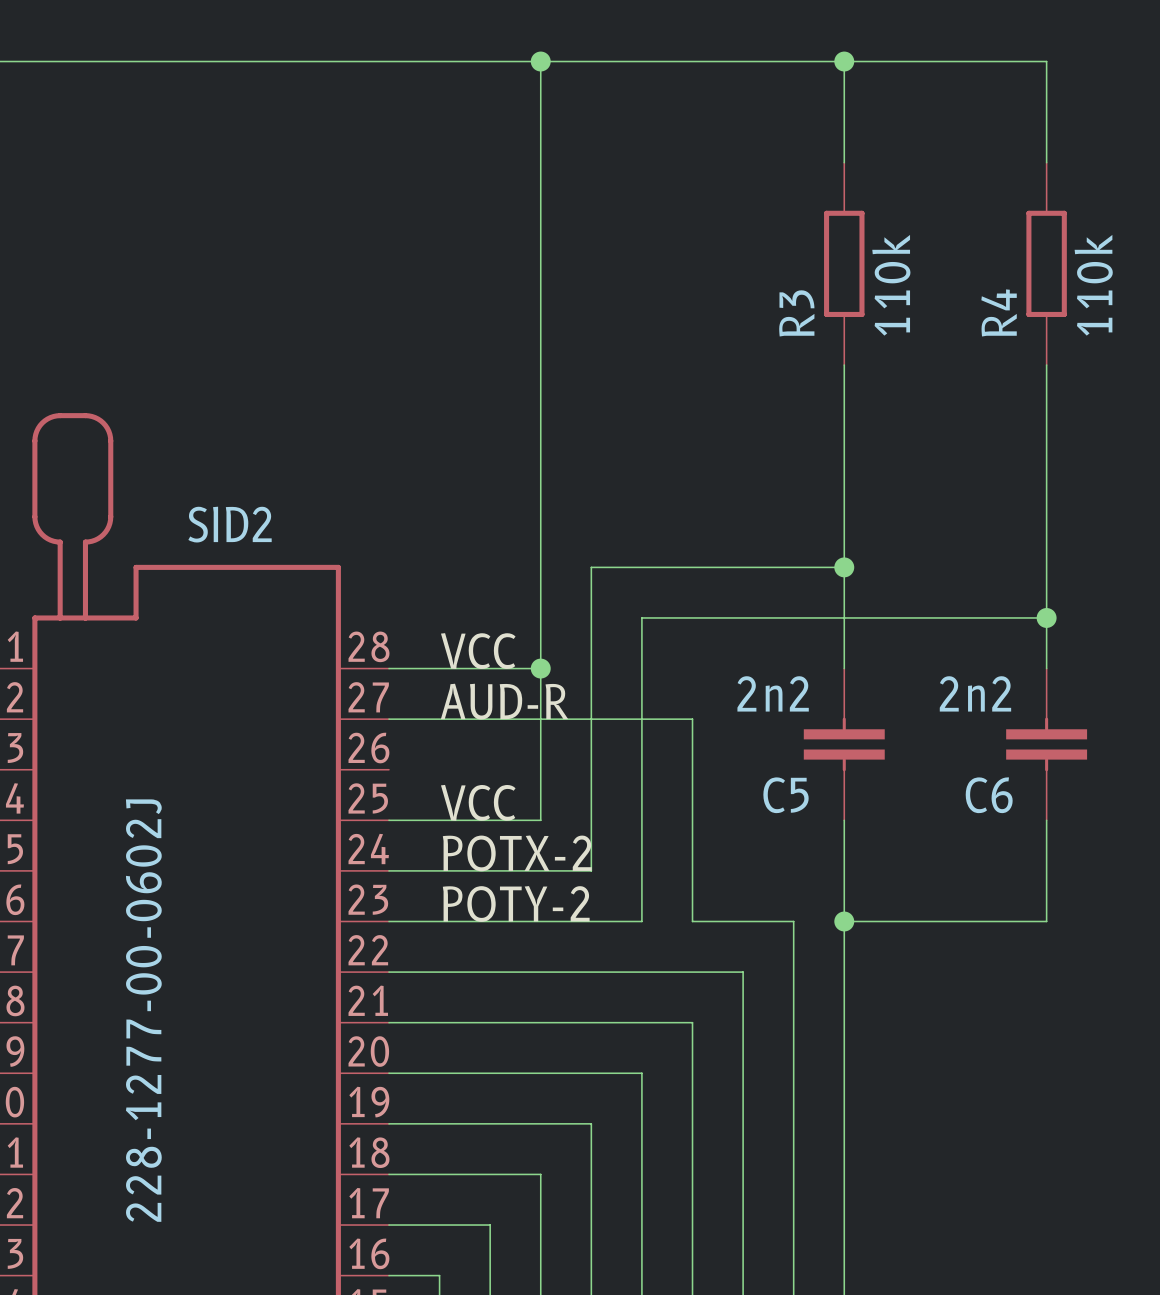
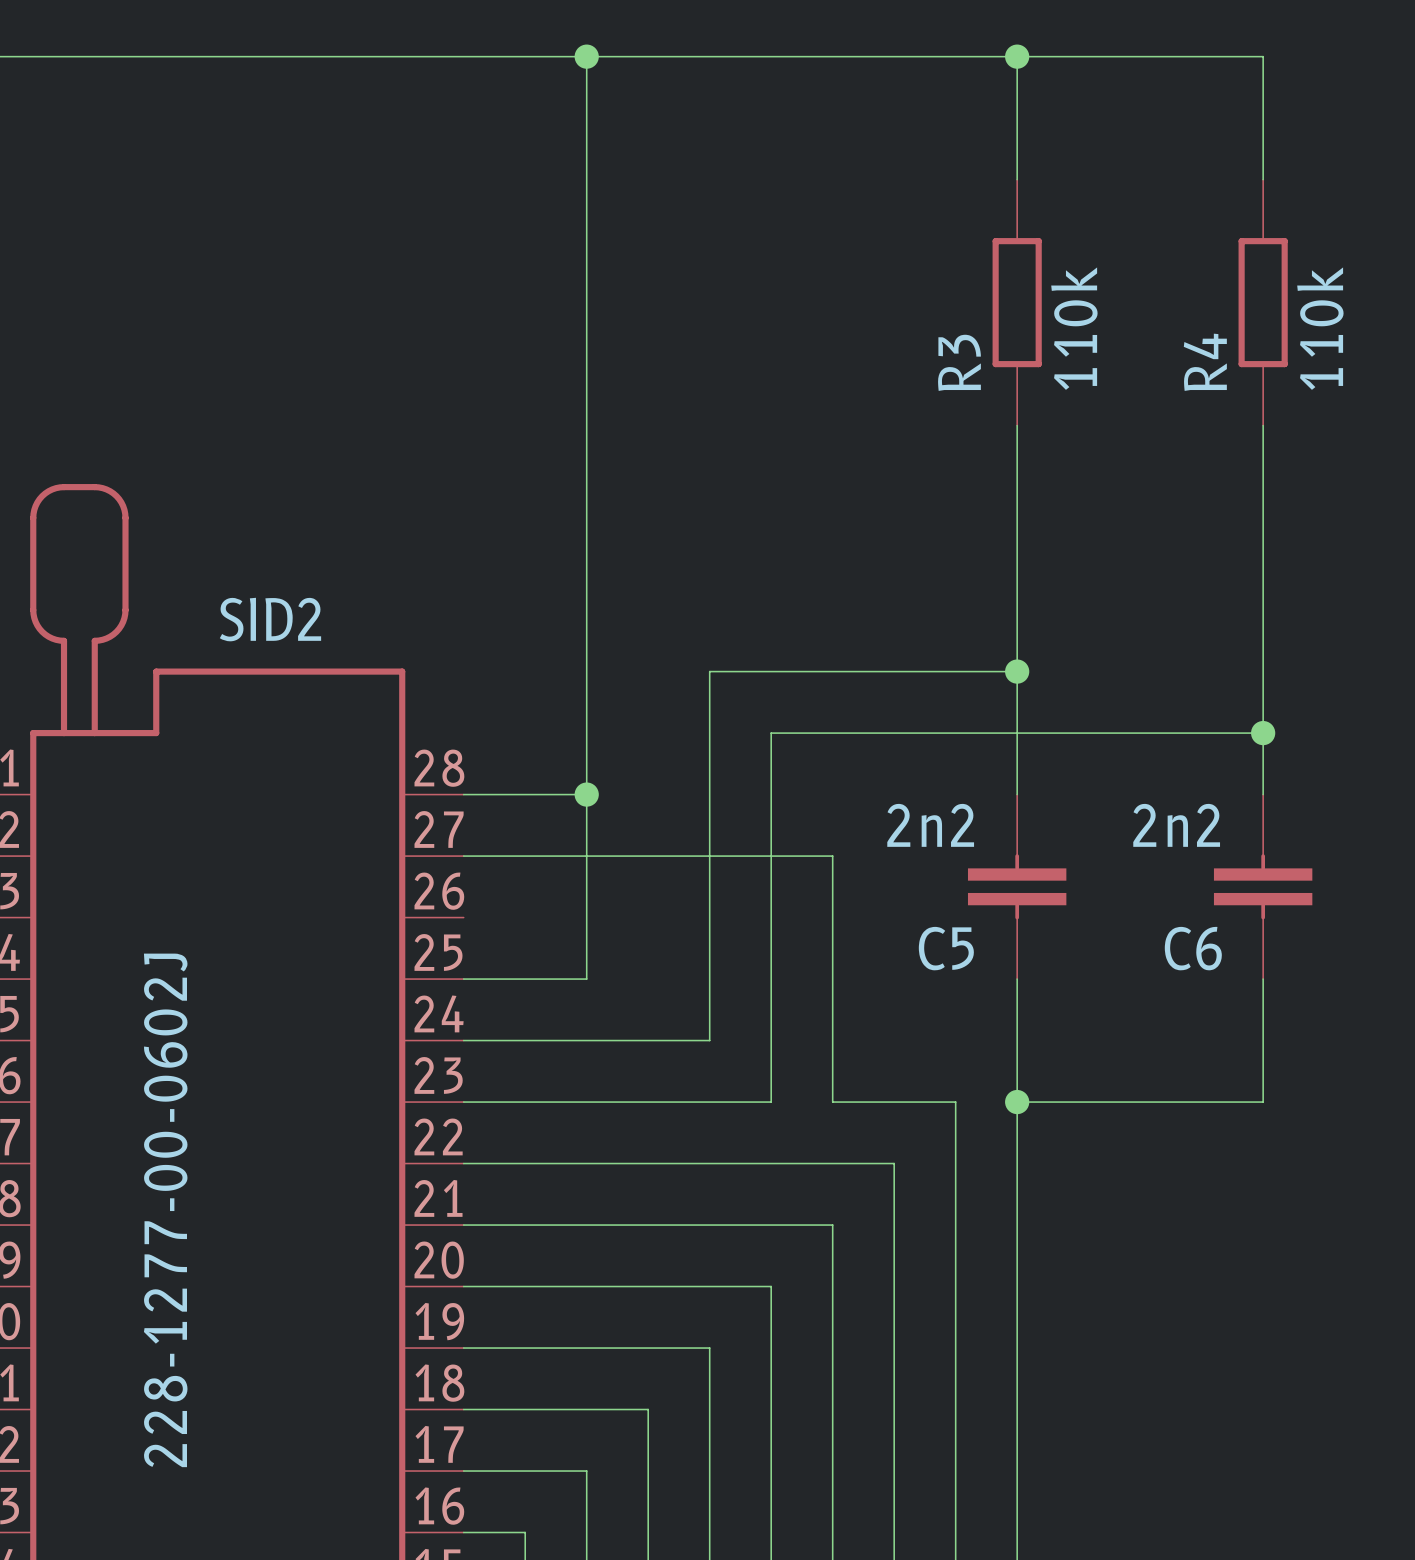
wire: (540, 61) (540, 820) (490, 820) -> (586, 56) (586, 979)
junction position: (540, 61) -> (586, 56)
label: VCC (478, 651) -> none
wire: (490, 668) (540, 668) -> none
junction position: (540, 668) -> (586, 794)
label: AUD-R (504, 701) -> none
label: VCC (478, 802) -> none
label: POTX-2 (517, 853) -> none
label: POTY-2 (516, 903) -> none

